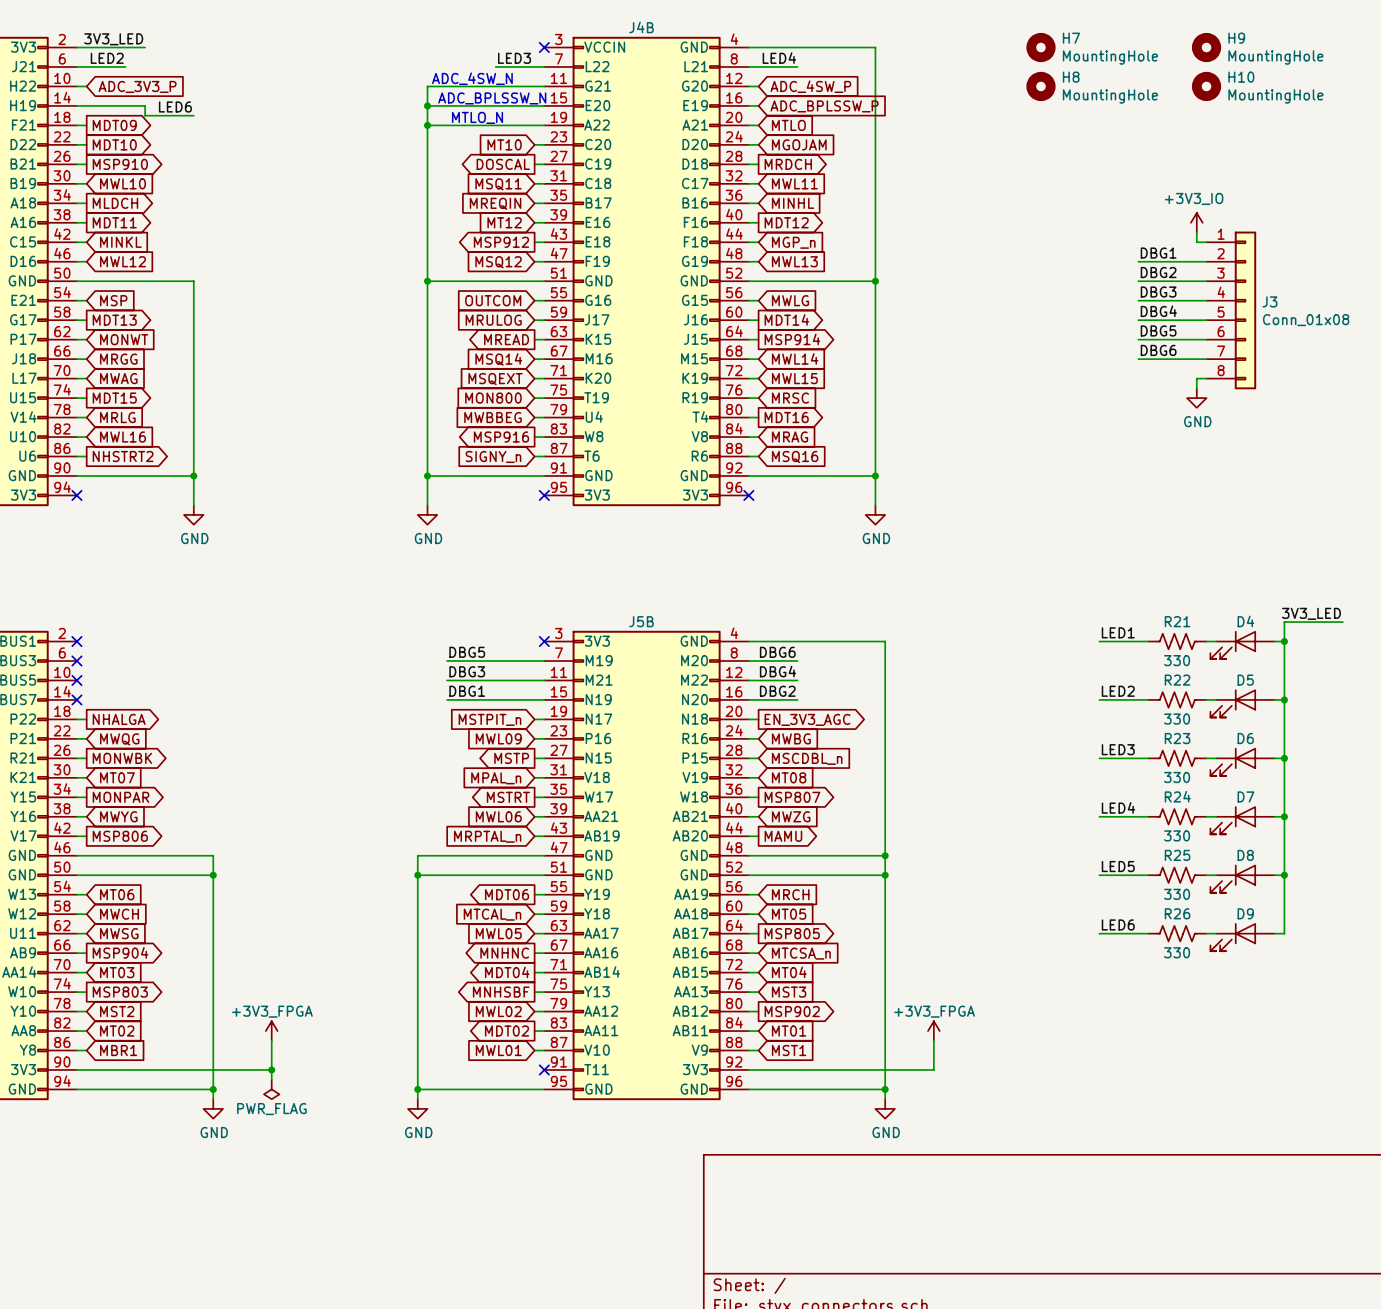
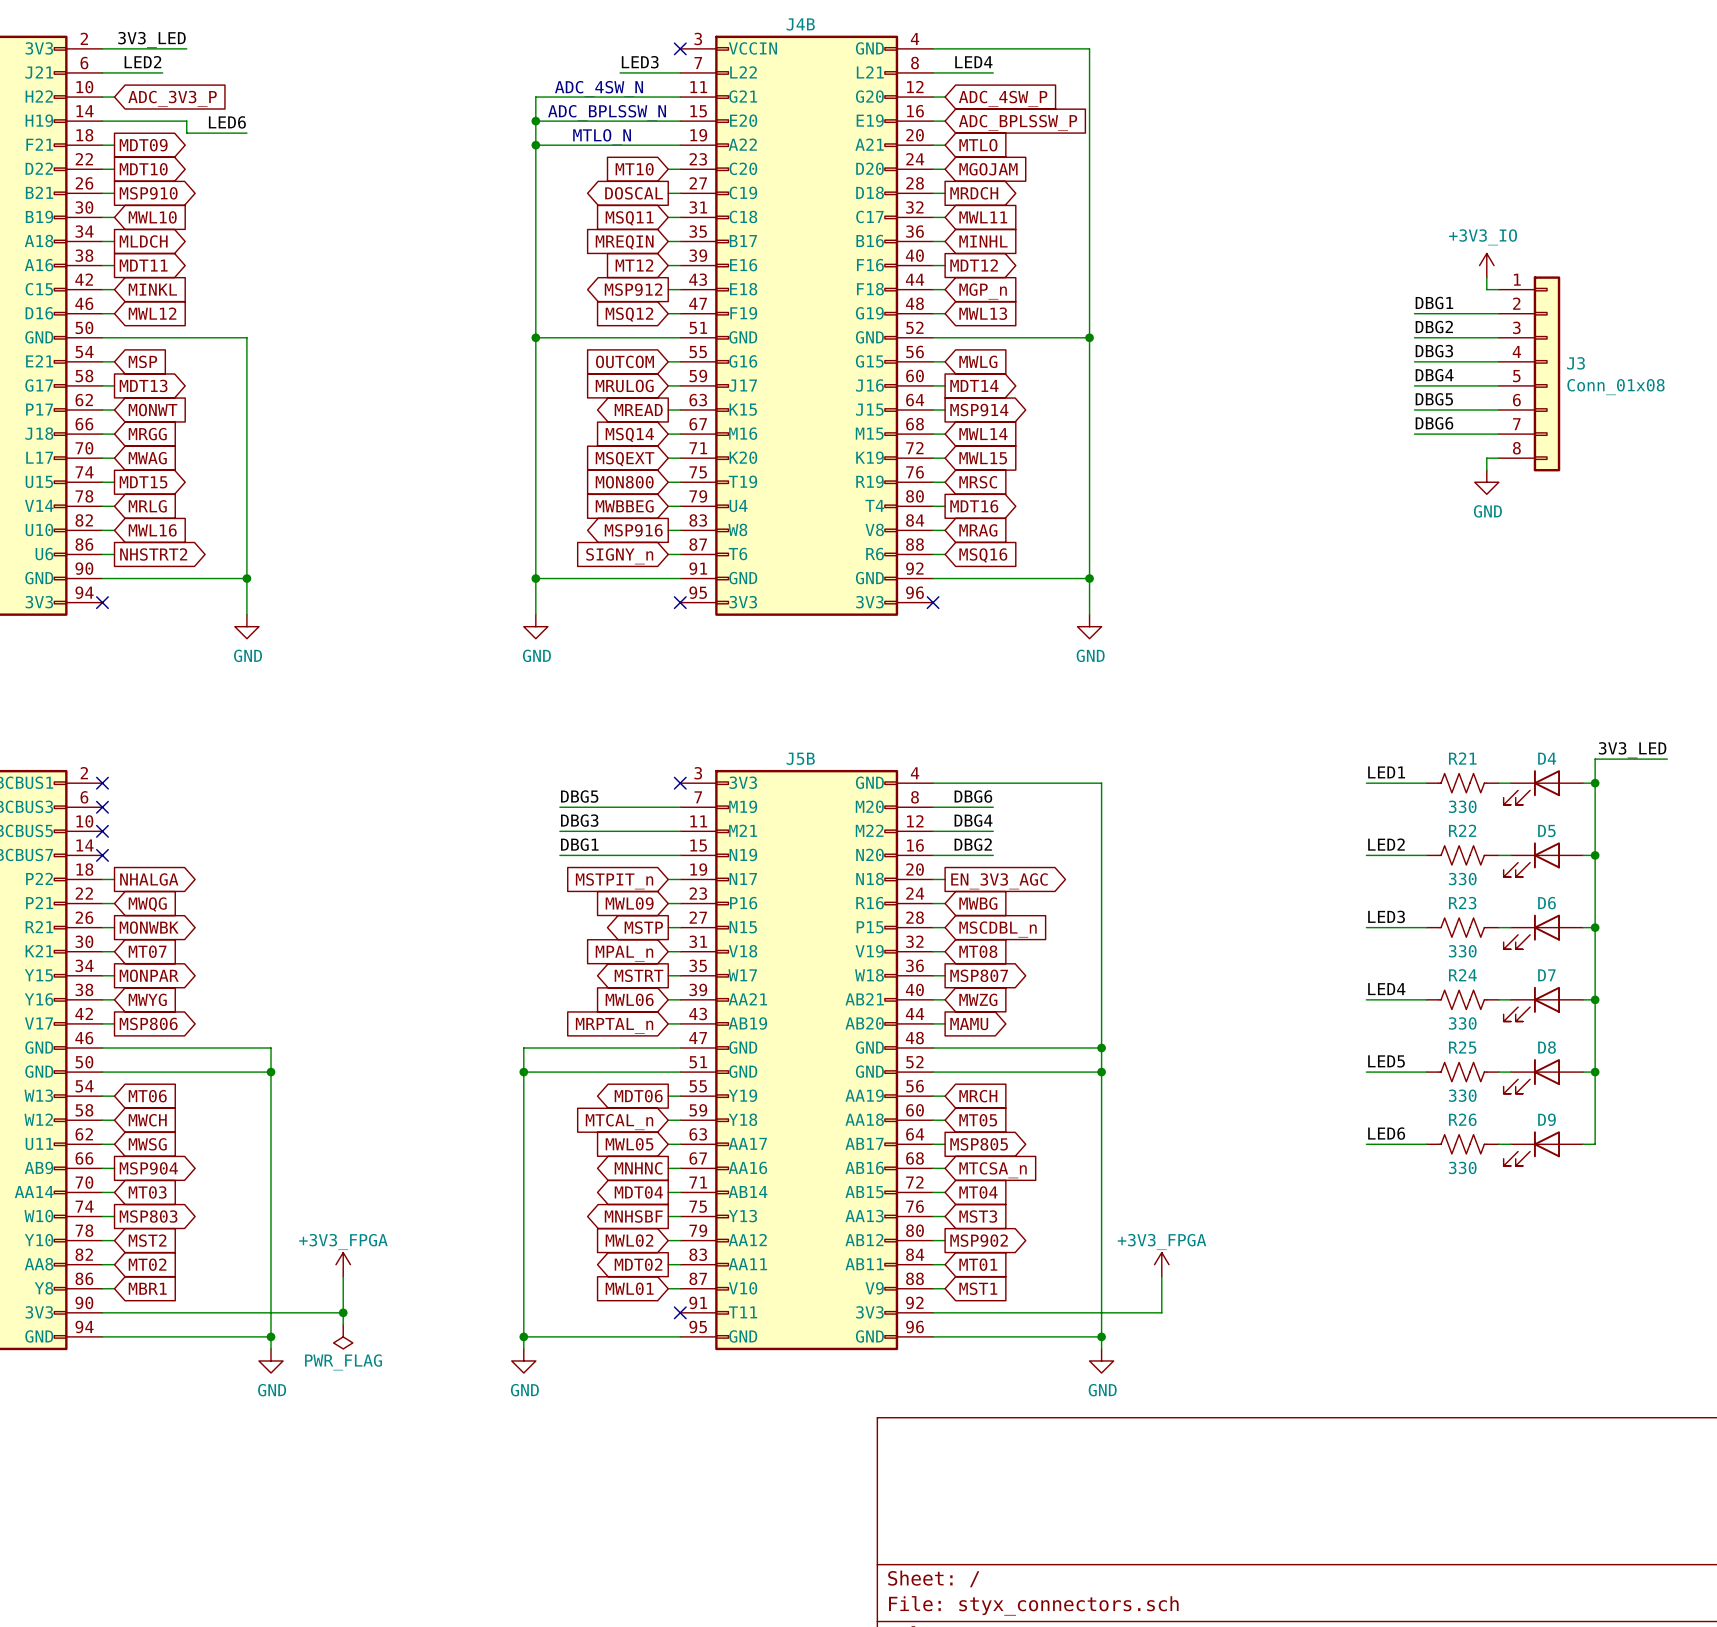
H7: MountingHole (1040, 47) -> none
H9: MountingHole (1206, 47) -> none
H8: MountingHole (1040, 86) -> none
H10: MountingHole (1206, 86) -> none

